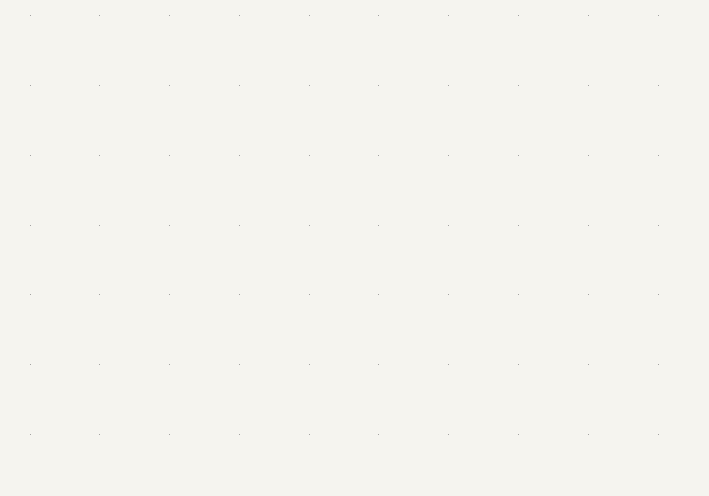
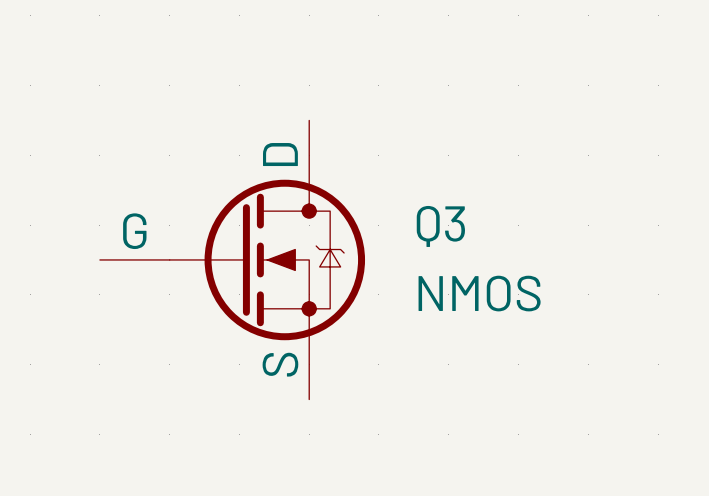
Q3: none -> NMOS (232, 259)

